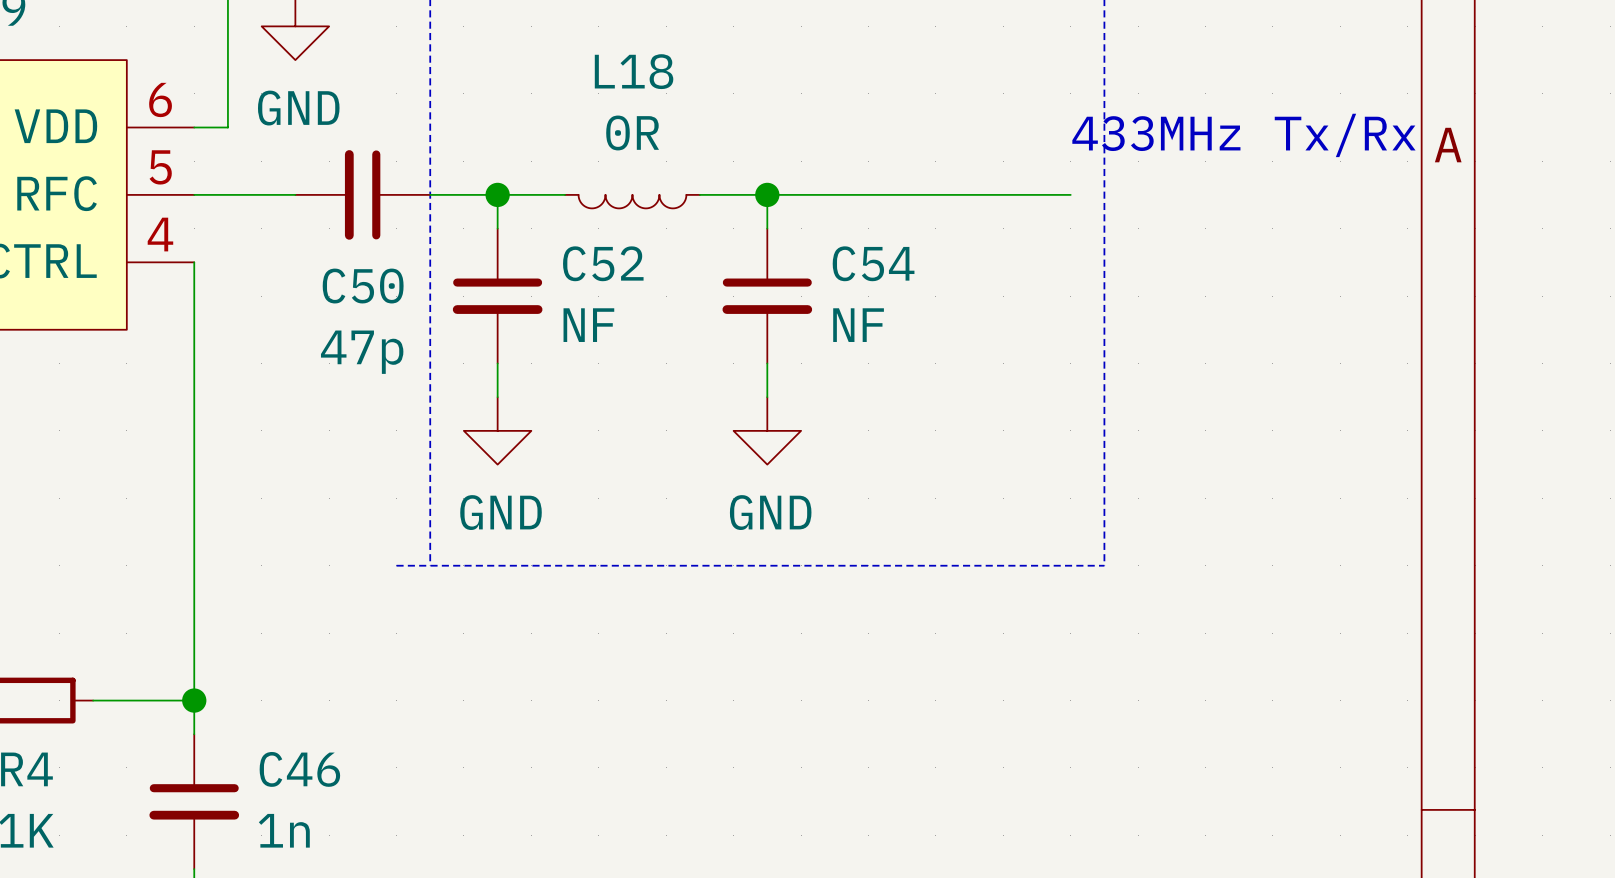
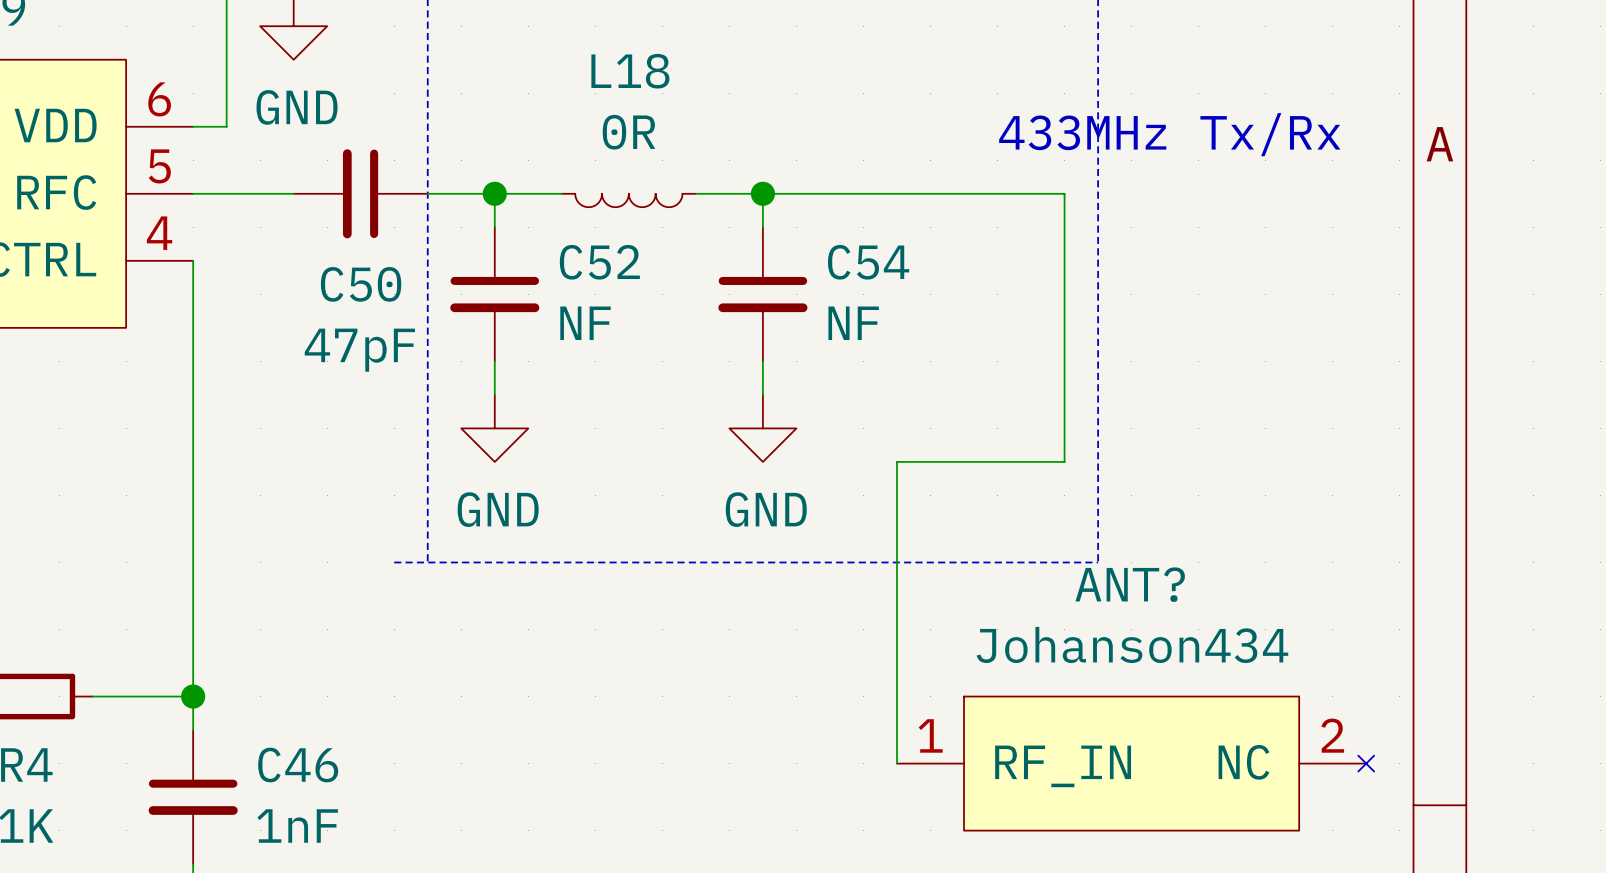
text position: 433MHz Tx/Rx (1243, 135) -> 433MHz Tx/Rx (1169, 134)
wire: none -> (1064, 193) (1064, 461) (896, 461) (896, 763)
C50 value: 47p (362, 352) -> 47pF (359, 350)
ANT?: none -> Johanson434 (1135, 763)
C46 value: 1n (284, 830) -> 1nF (297, 826)

